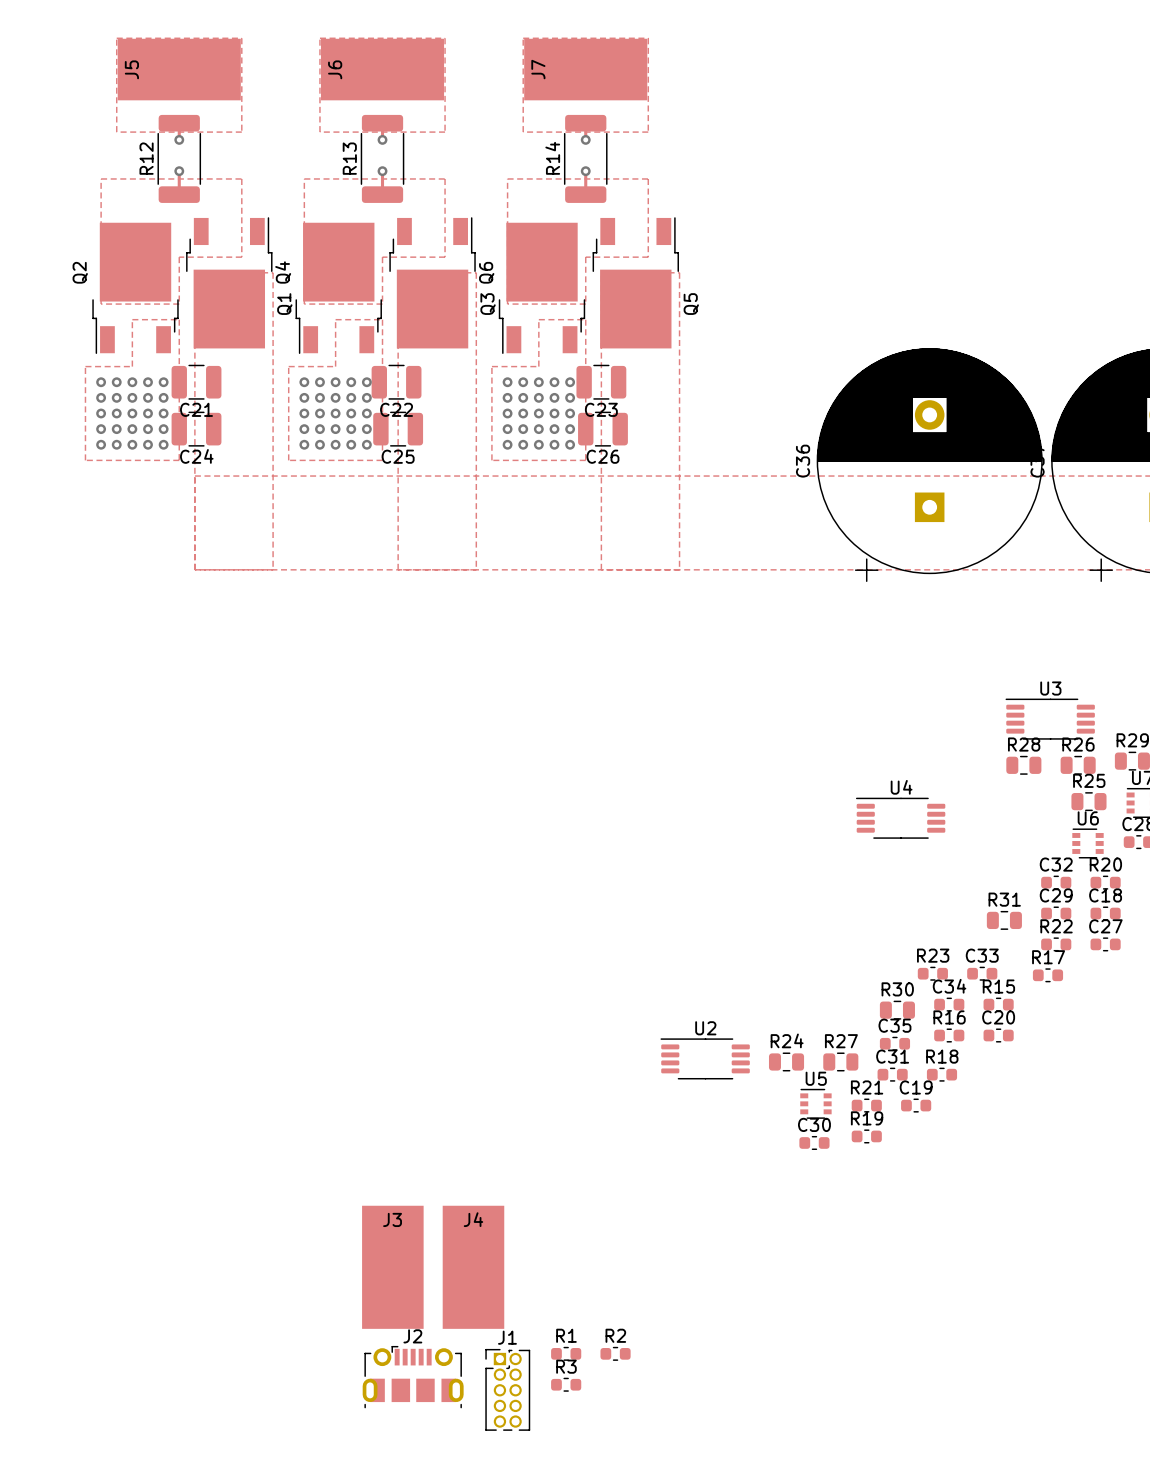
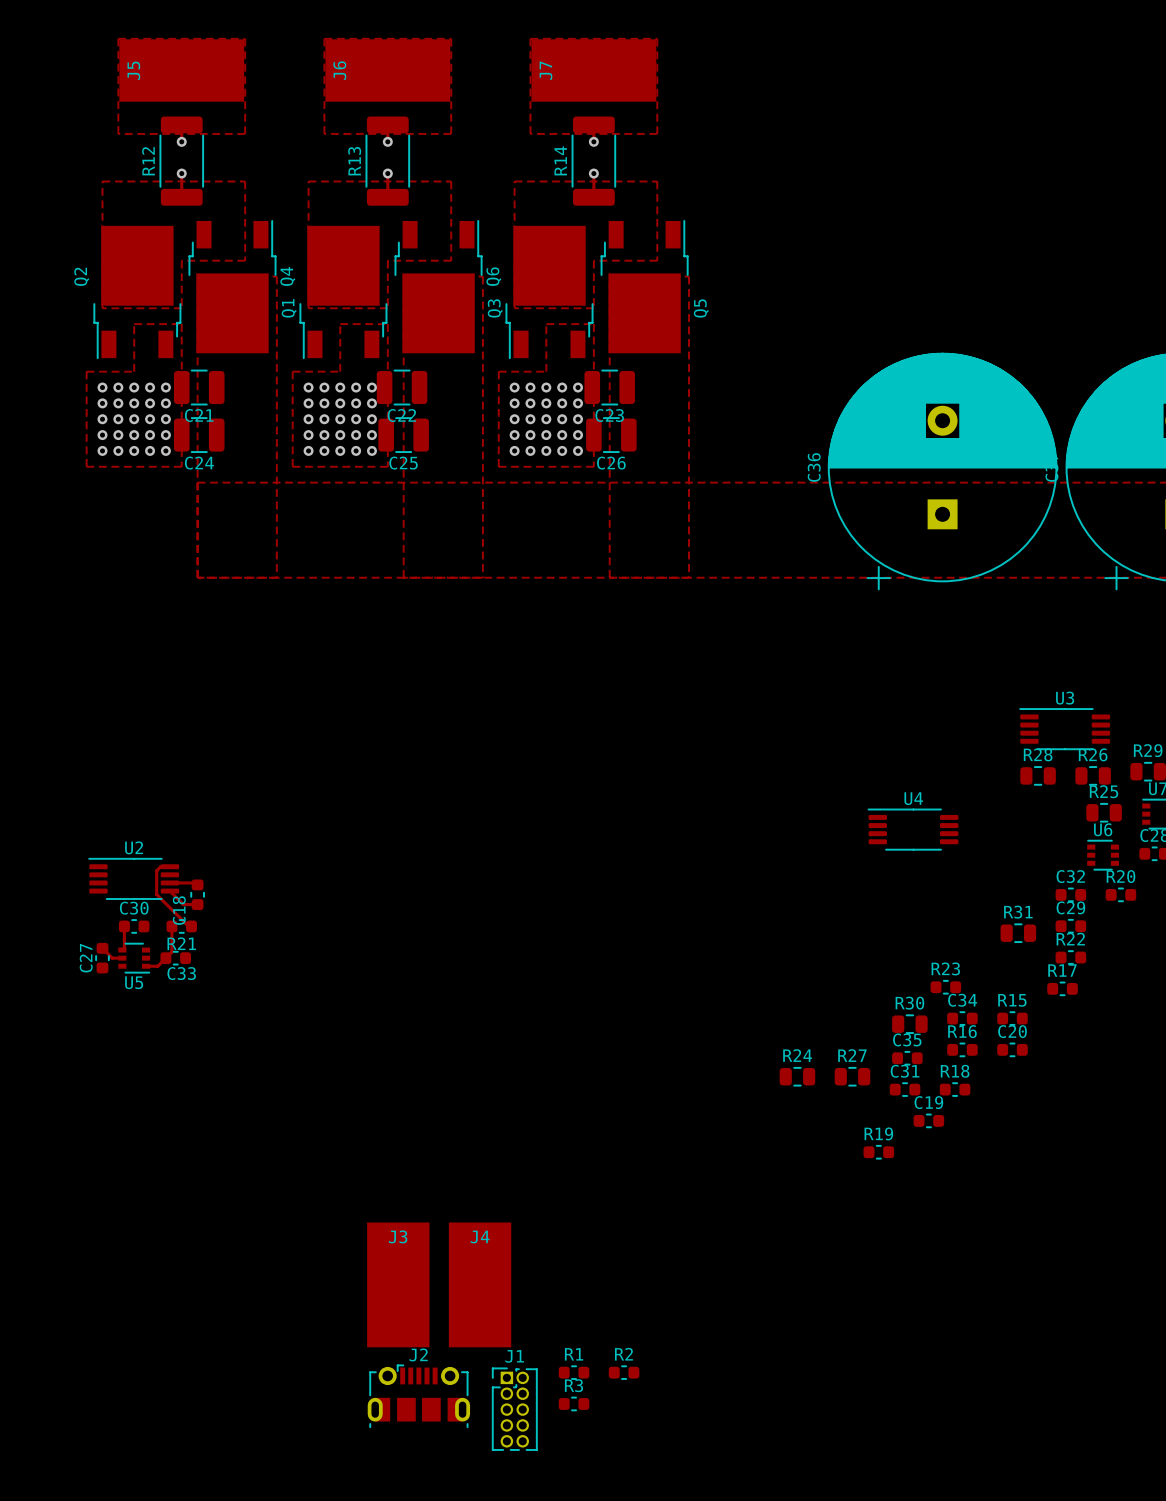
track: none -> (169, 866) (160, 866) (156, 870) (156, 894) (188, 926) (191, 926)
track: none -> (169, 882) (195, 882) (197, 884)
track: none -> (169, 891) (183, 904) (197, 904)
C18 name position: C18 (1105, 895) -> C18 (179, 910)
track: none -> (124, 926) (124, 948) (122, 950)
track: none -> (171, 926) (171, 952) (157, 966) (146, 966)
C18 rotation: 0° (1105, 913) -> 90° clockwise (197, 894)
C18 position: (1105, 913) -> (197, 894)
track: none -> (102, 948) (112, 958) (122, 958)
C27 rotation: 0° (1105, 944) -> 90° clockwise (102, 958)
C27 position: (1105, 944) -> (102, 958)
C33 name position: C33 (982, 955) -> C33 (181, 973)
C33 position: (982, 973) -> (175, 958)
U2 position: (705, 1058) -> (133, 878)
R21 name position: R21 (867, 1087) -> R21 (181, 943)
U5 rotation: 0° (815, 1103) -> 180° (134, 958)
U5 position: (815, 1103) -> (134, 958)
R21 position: (866, 1105) -> (181, 926)
C30 position: (814, 1142) -> (134, 926)

